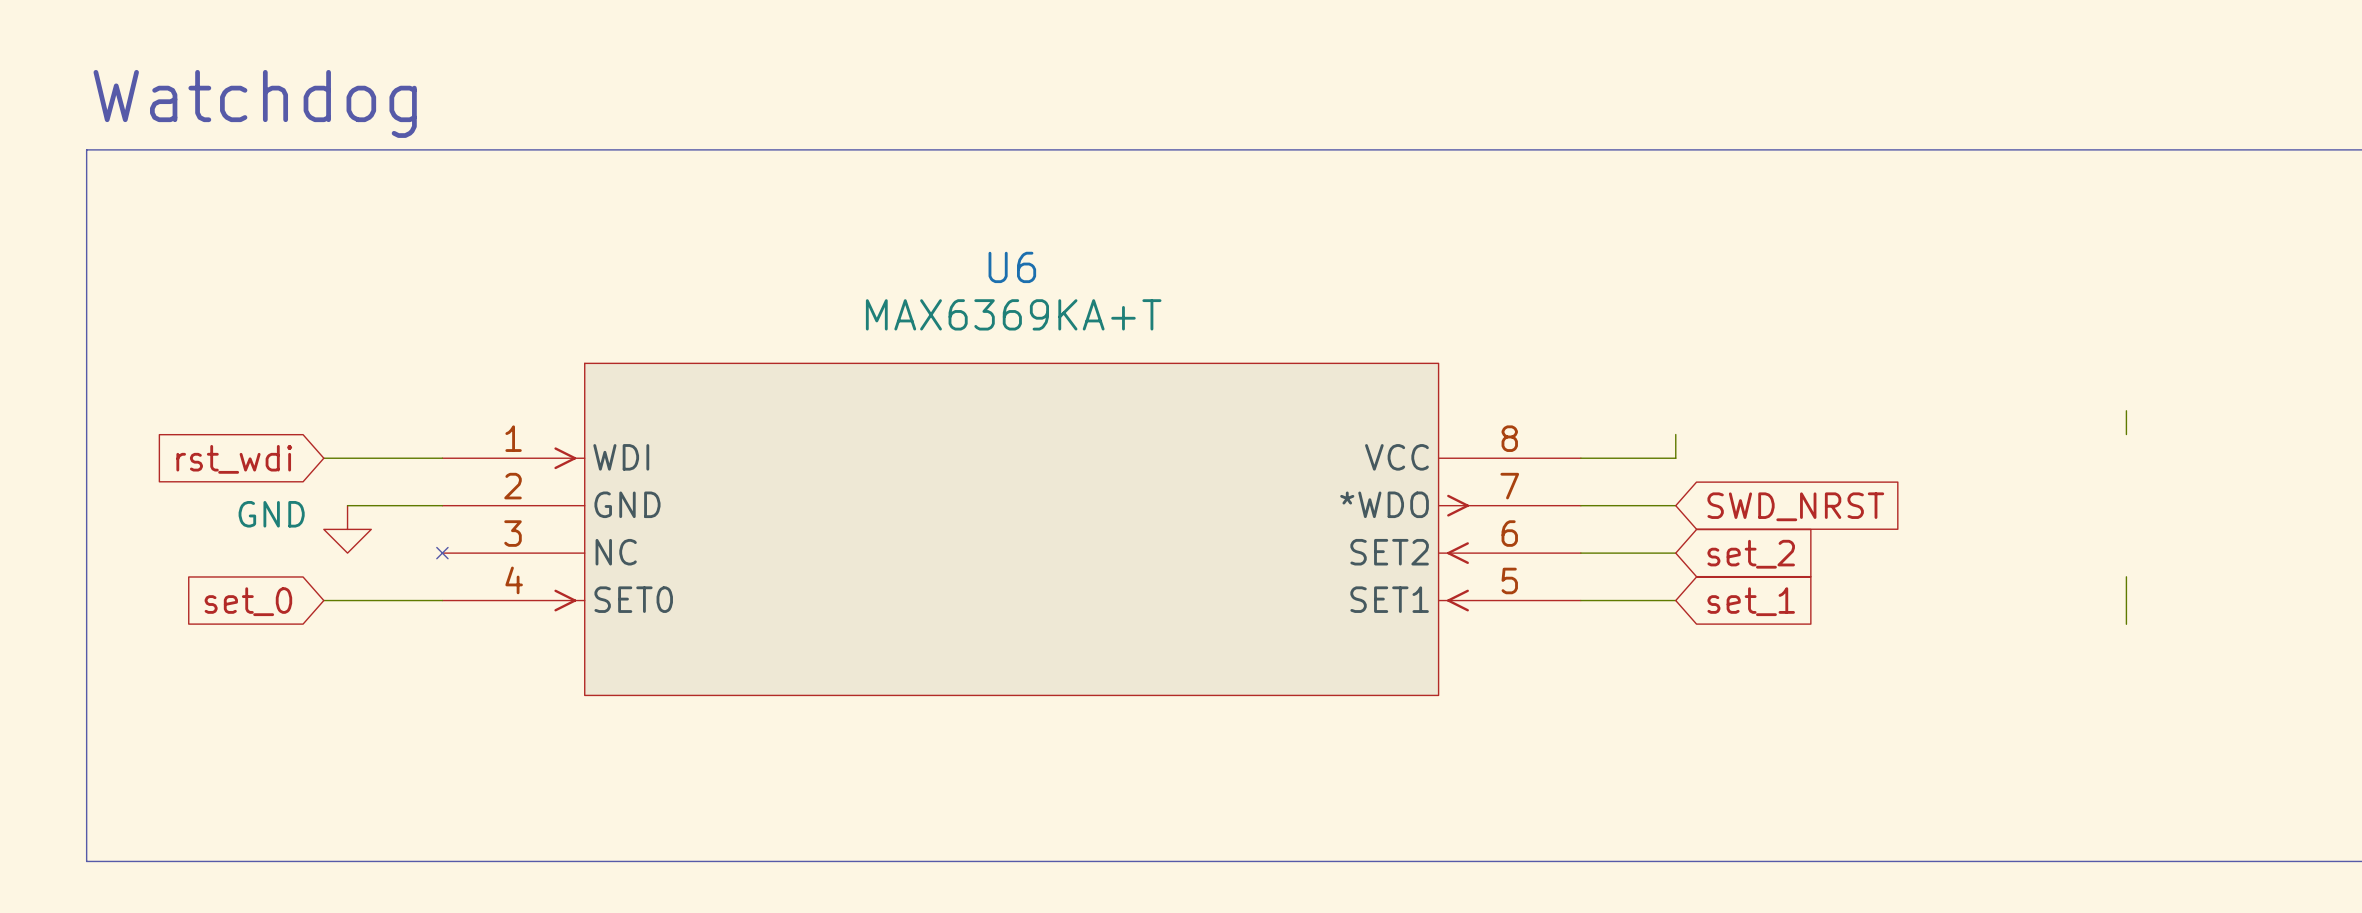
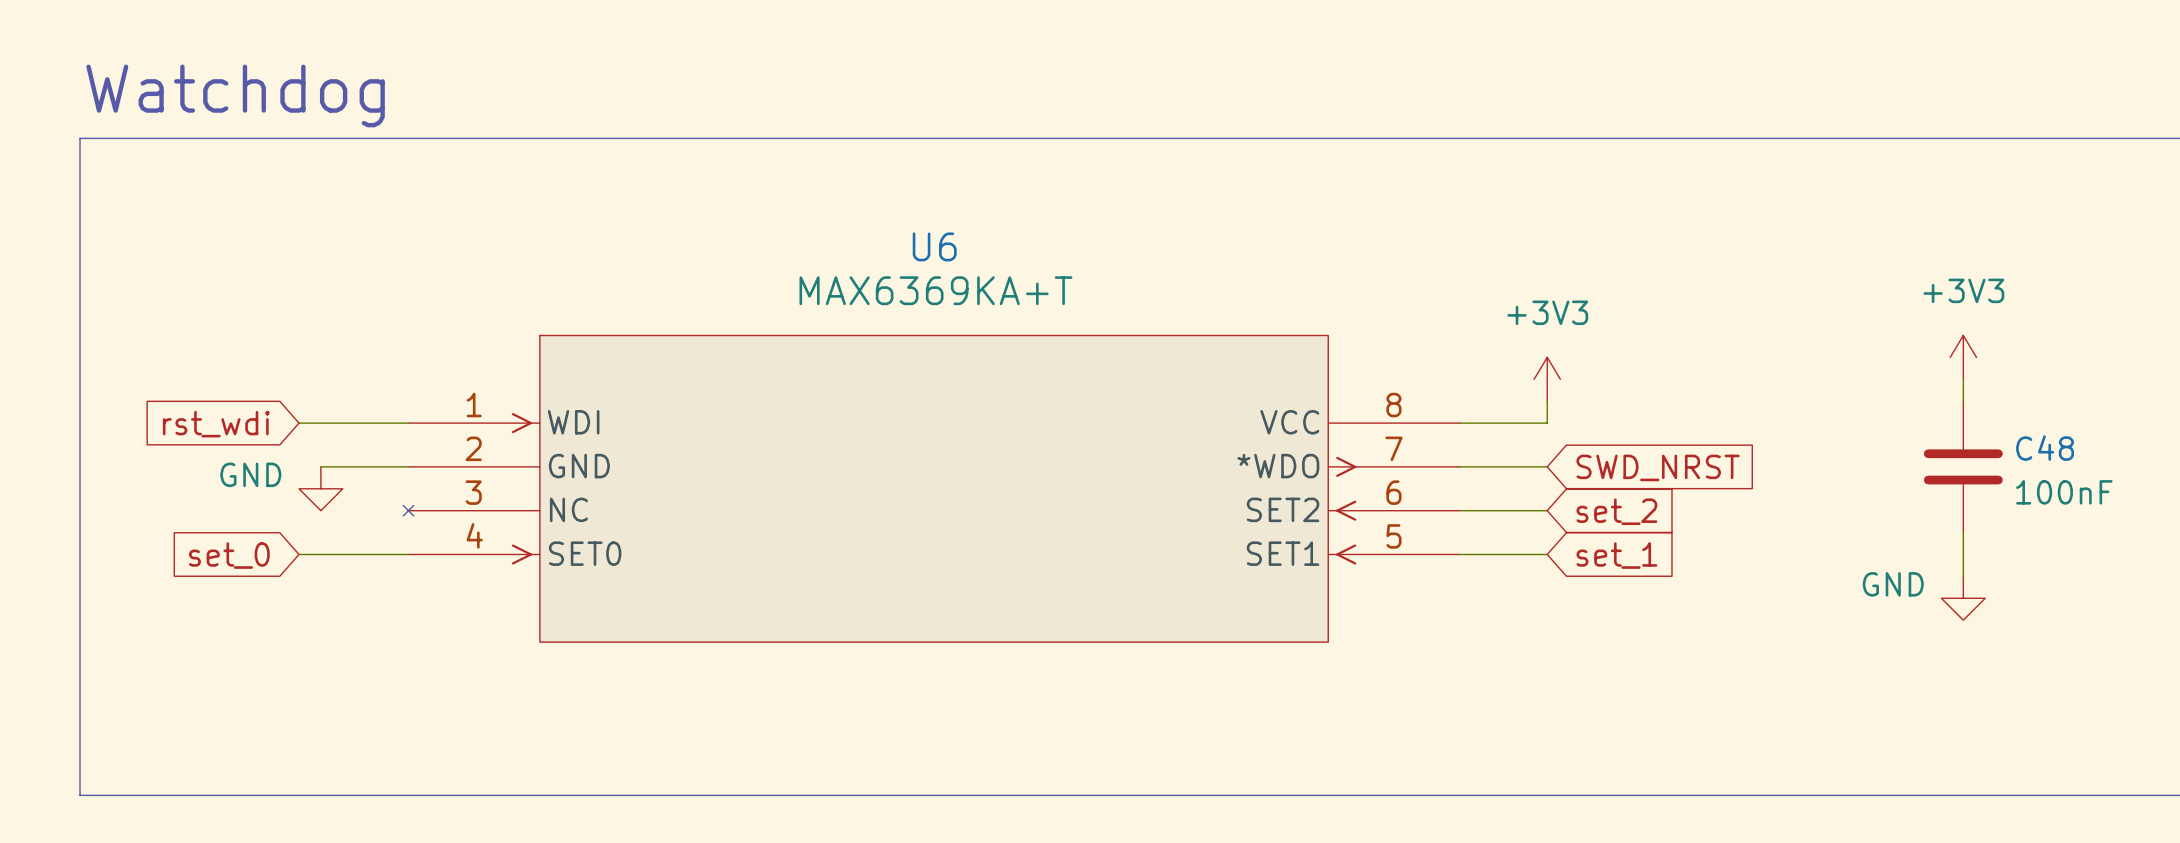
power symbol: none -> +3V3 (1963, 357)
power symbol: none -> +3V3 (1547, 379)
C48: none -> 100nF (1963, 466)
power symbol: none -> GND (1963, 598)

